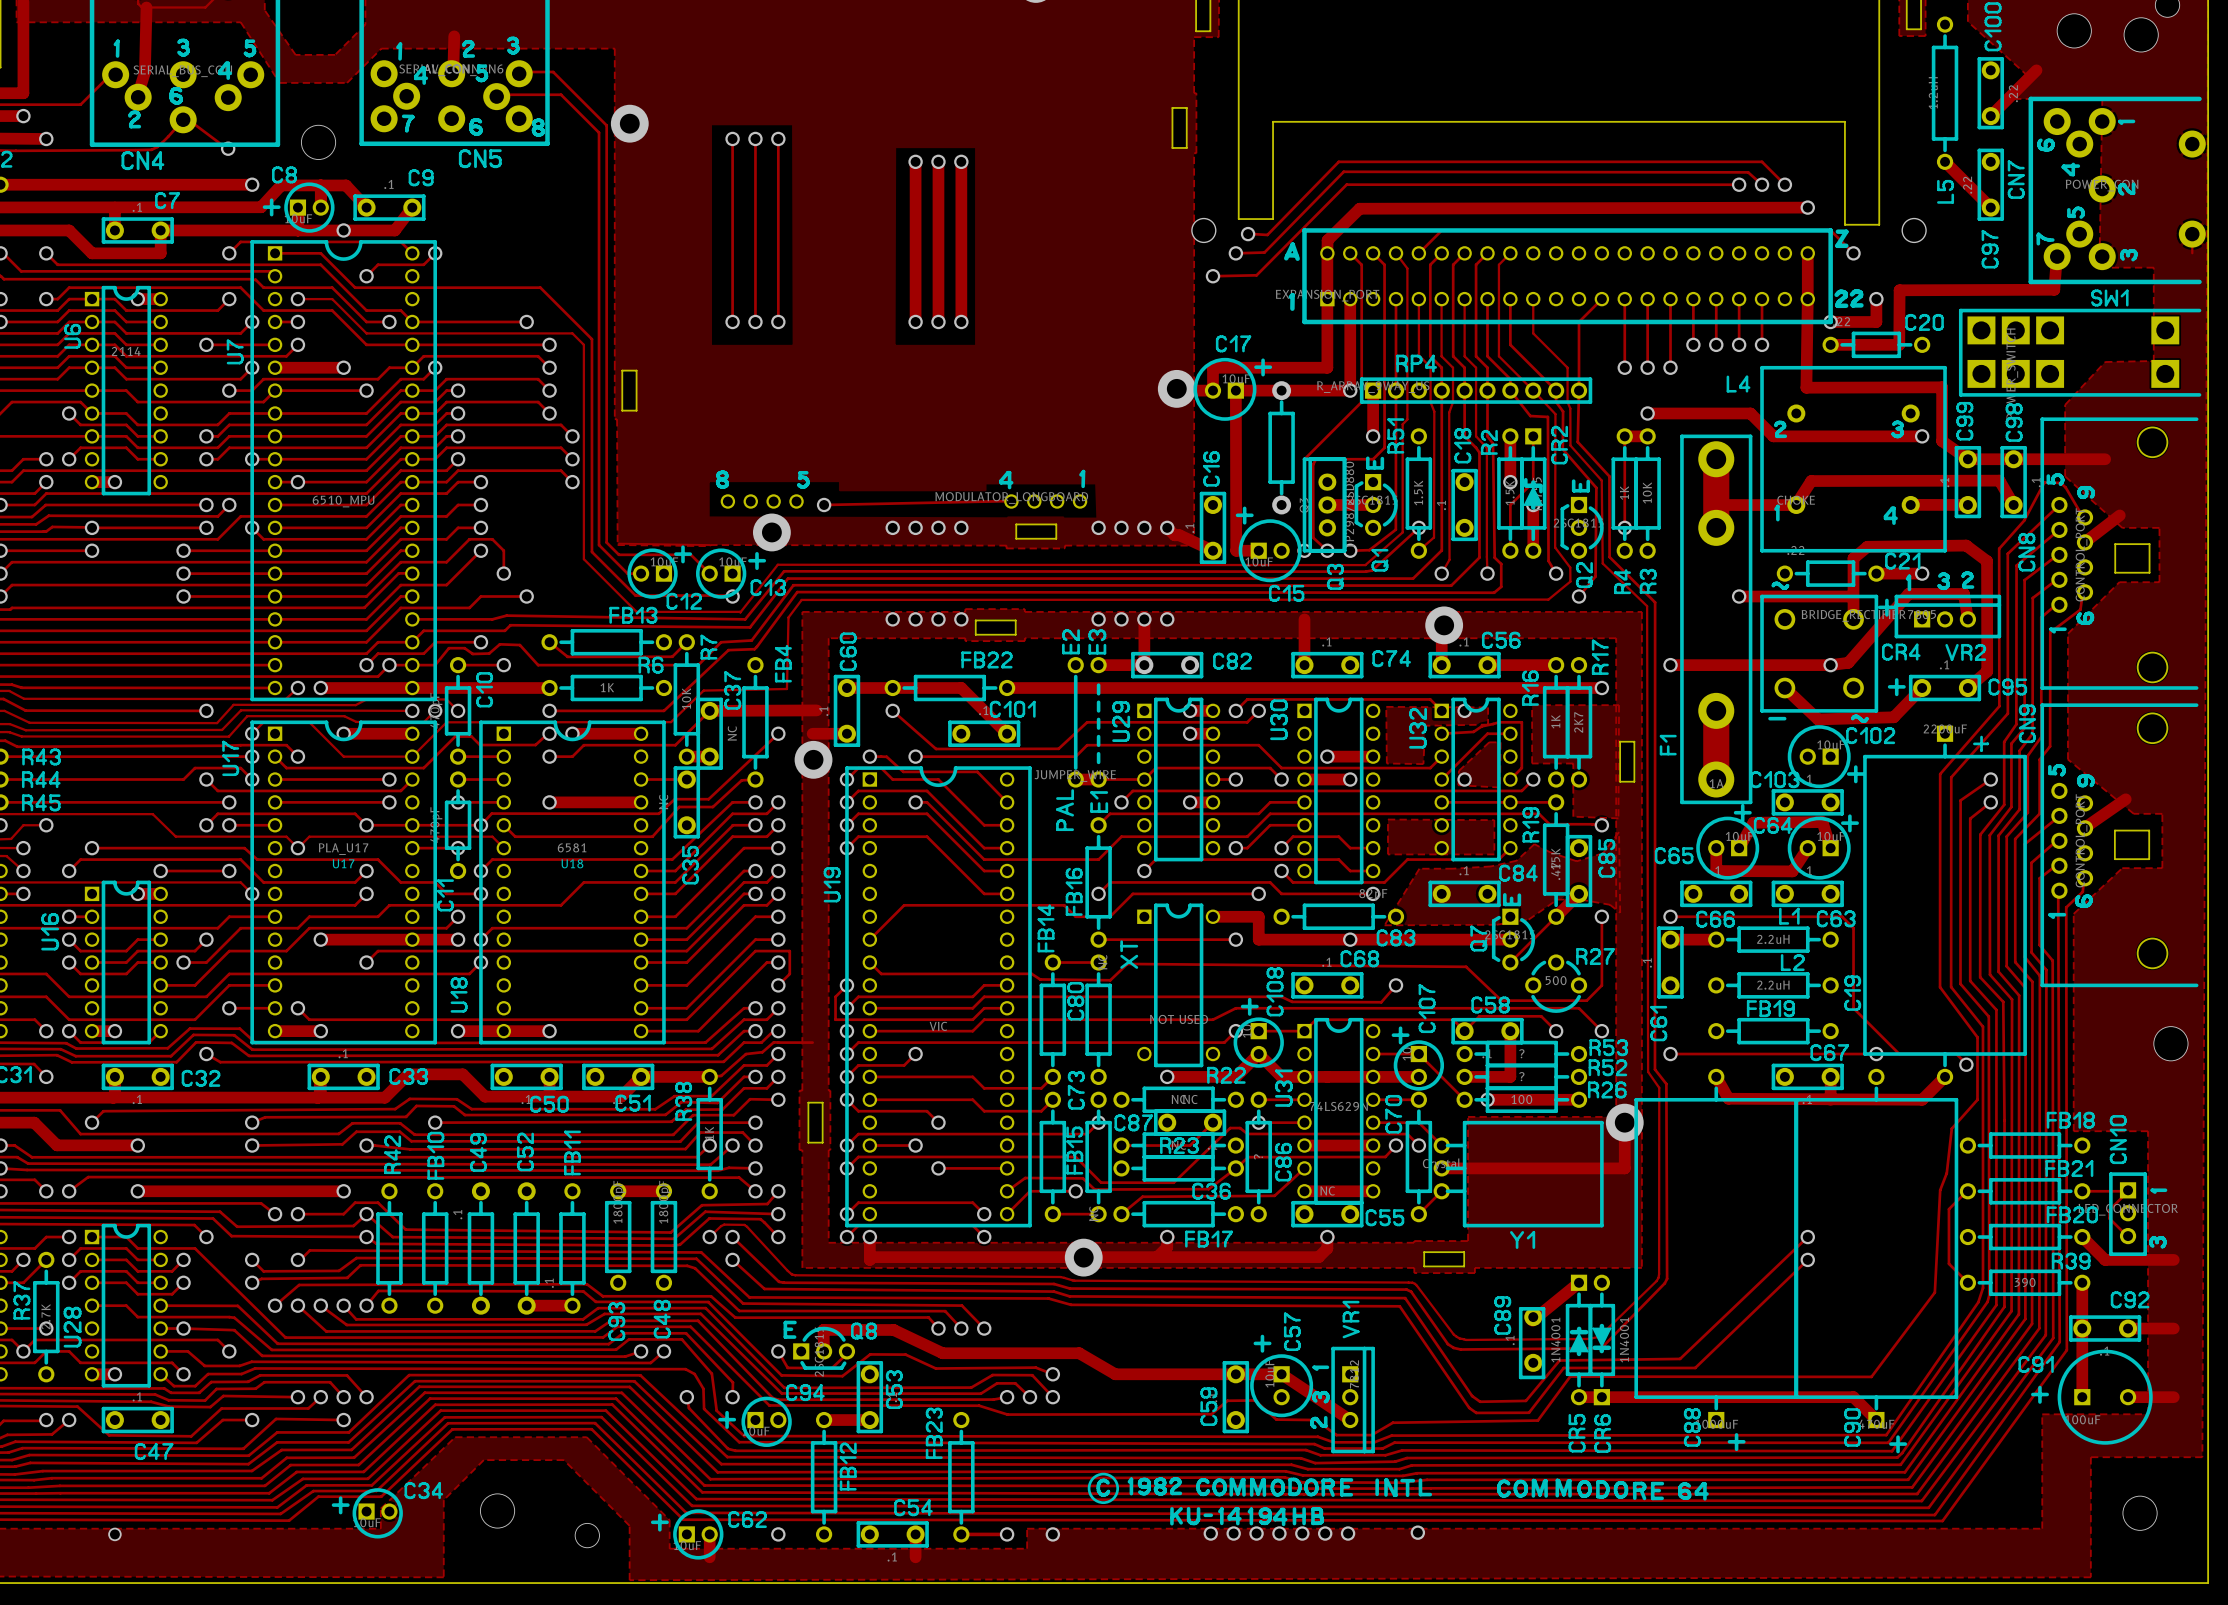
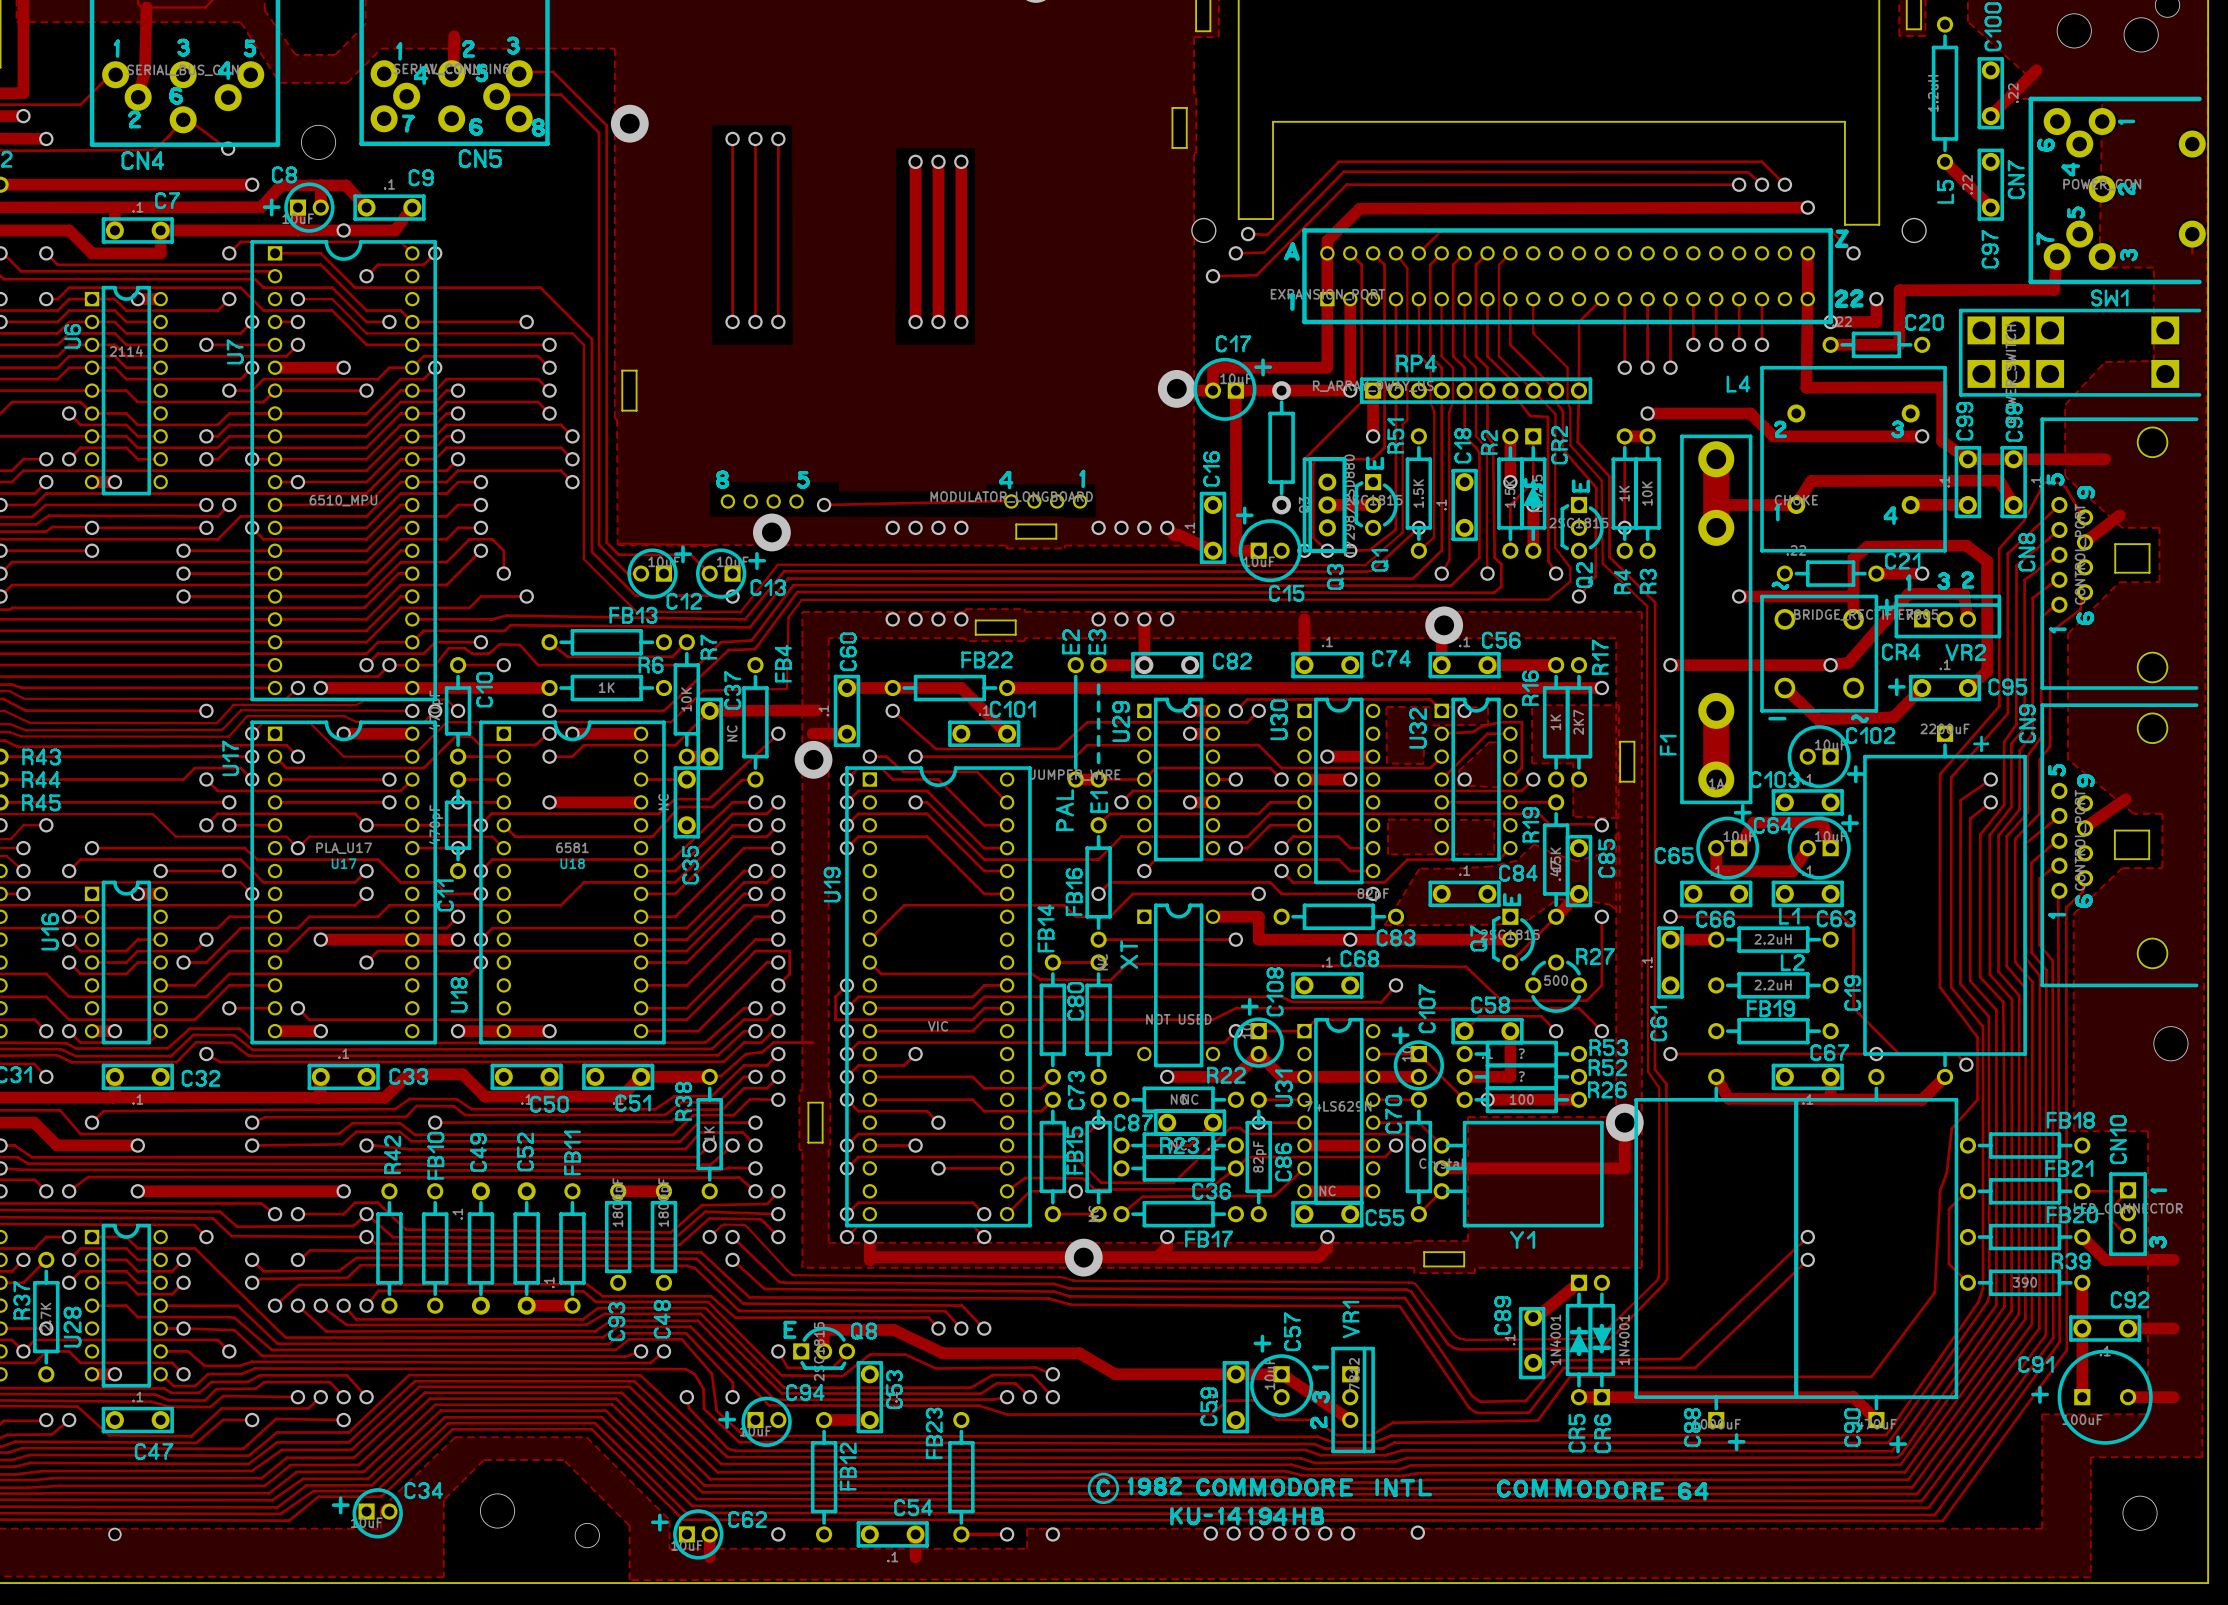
part value: ? (1258, 1156) -> 82pF (1259, 1156)

